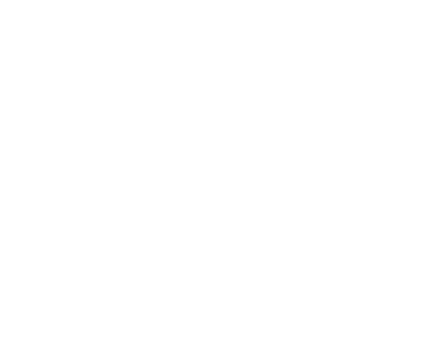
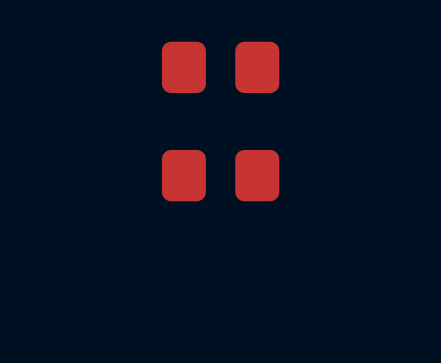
part: none -> (220, 67)
part: none -> (220, 175)

